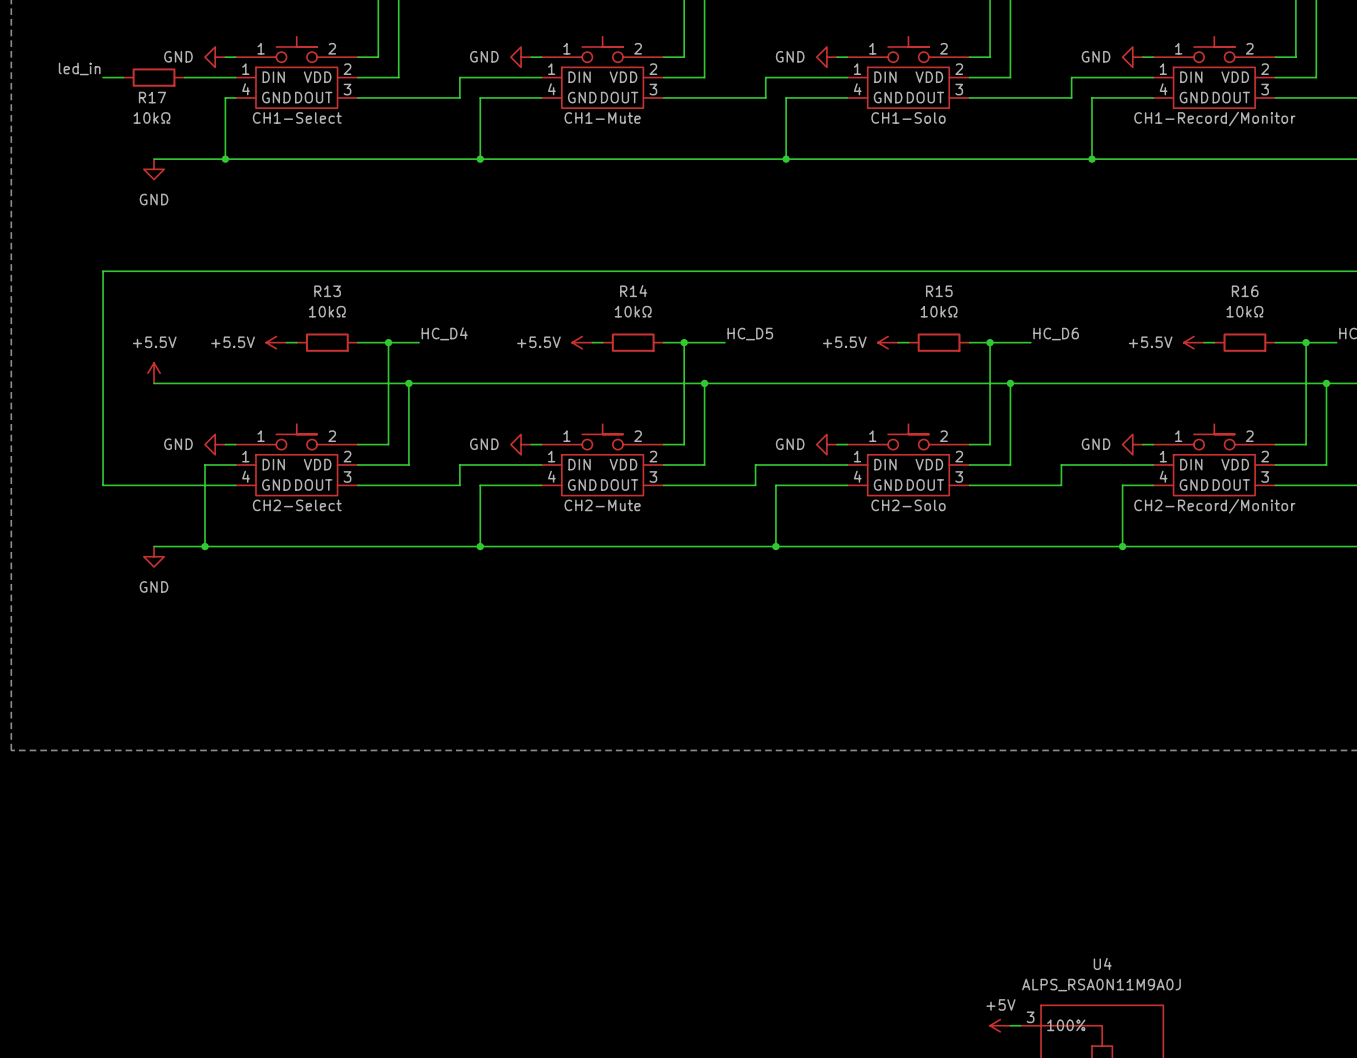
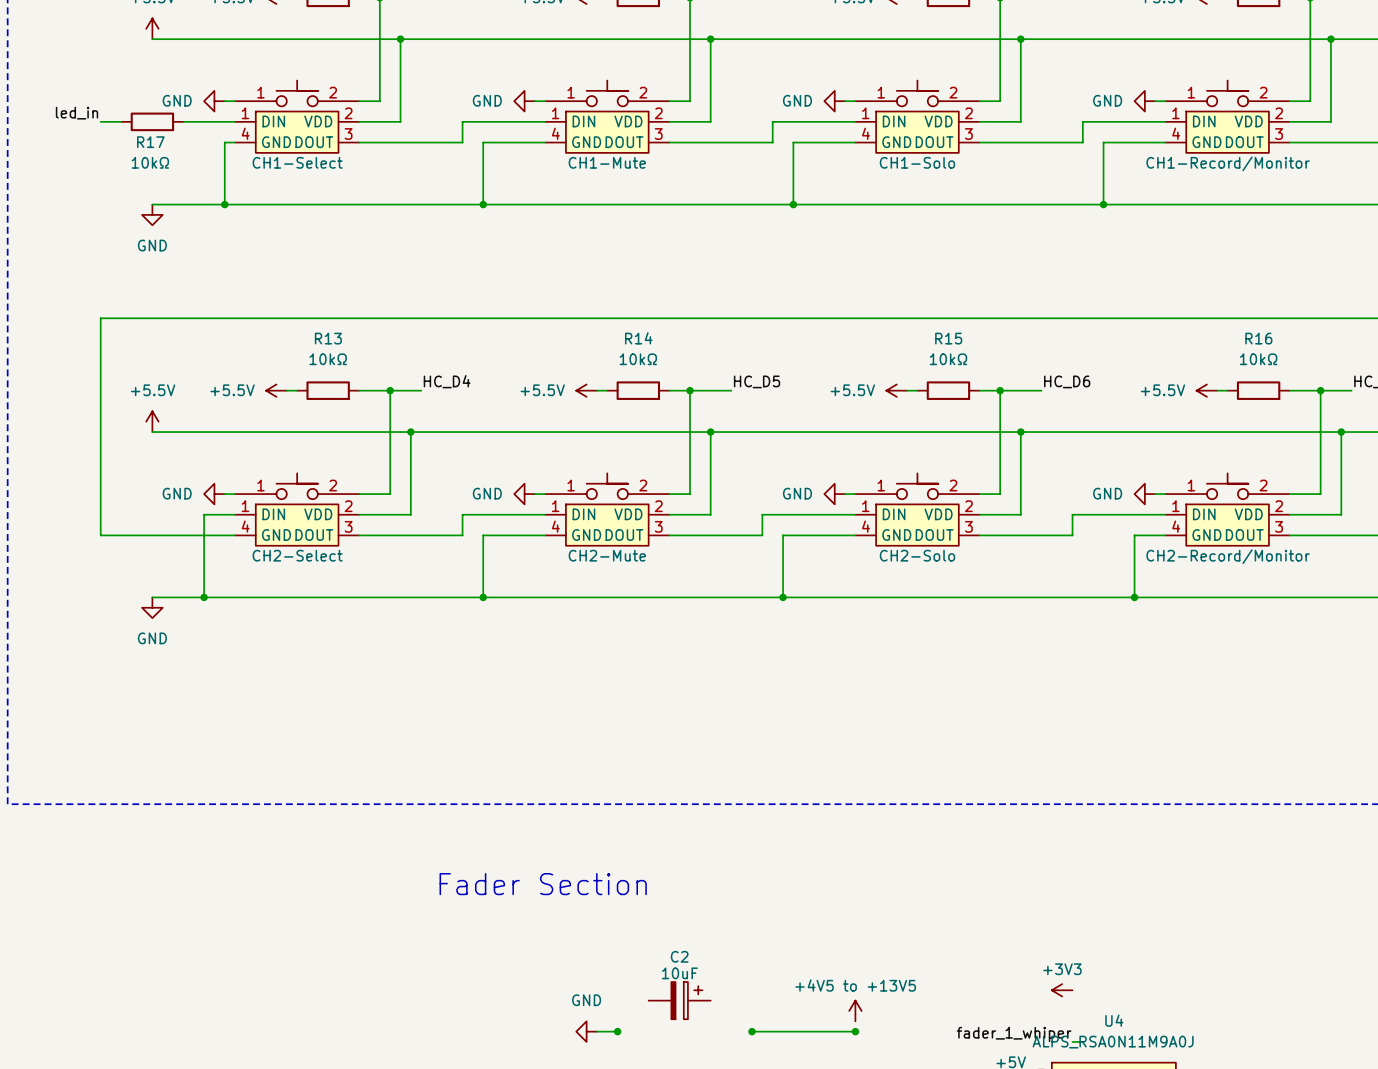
text: none -> Fader Section (543, 884)
power symbol: none -> +3V3 (1062, 990)
C2: none -> 10uF (679, 1000)
power symbol: none -> +4V5 to +13V5 (855, 1010)
power symbol: none -> GND (586, 1031)
wire: none -> (596, 1031) (617, 1031)
junction: none -> (617, 1031)
wire: none -> (752, 1031) (855, 1031)
junction: none -> (752, 1031)
junction: none -> (855, 1031)
label: none -> fader_1_whiper (1014, 1034)
wire: none -> (1072, 1041) (1082, 1041)

